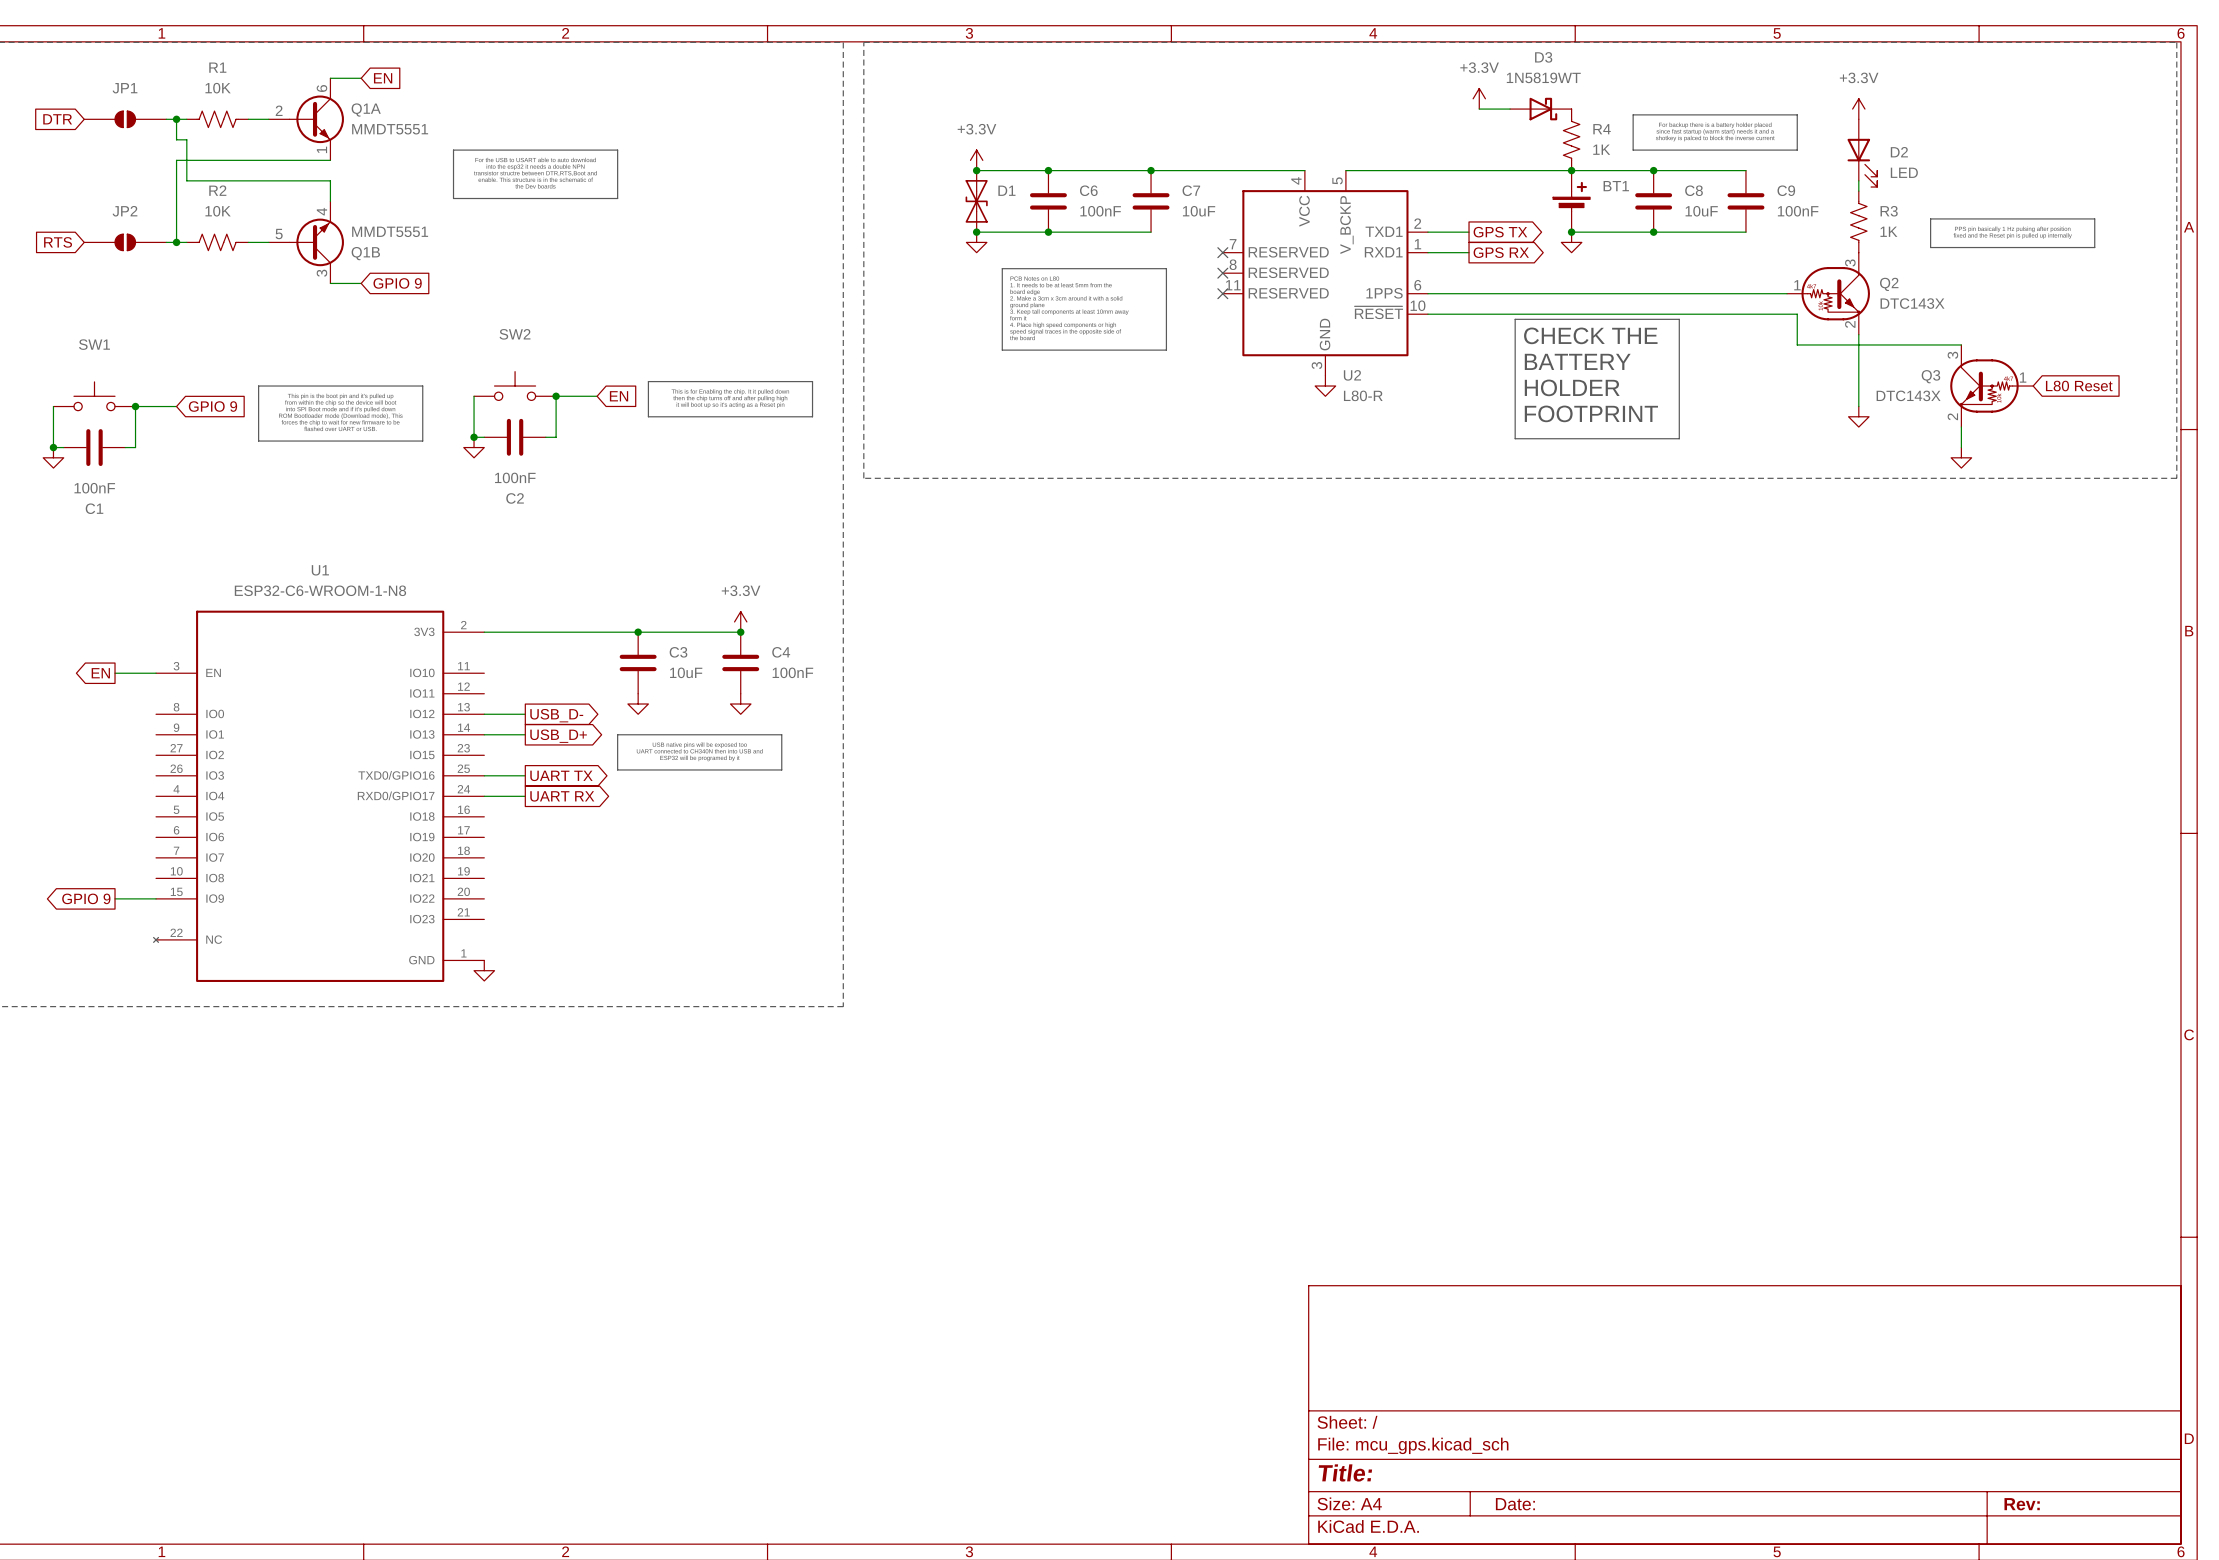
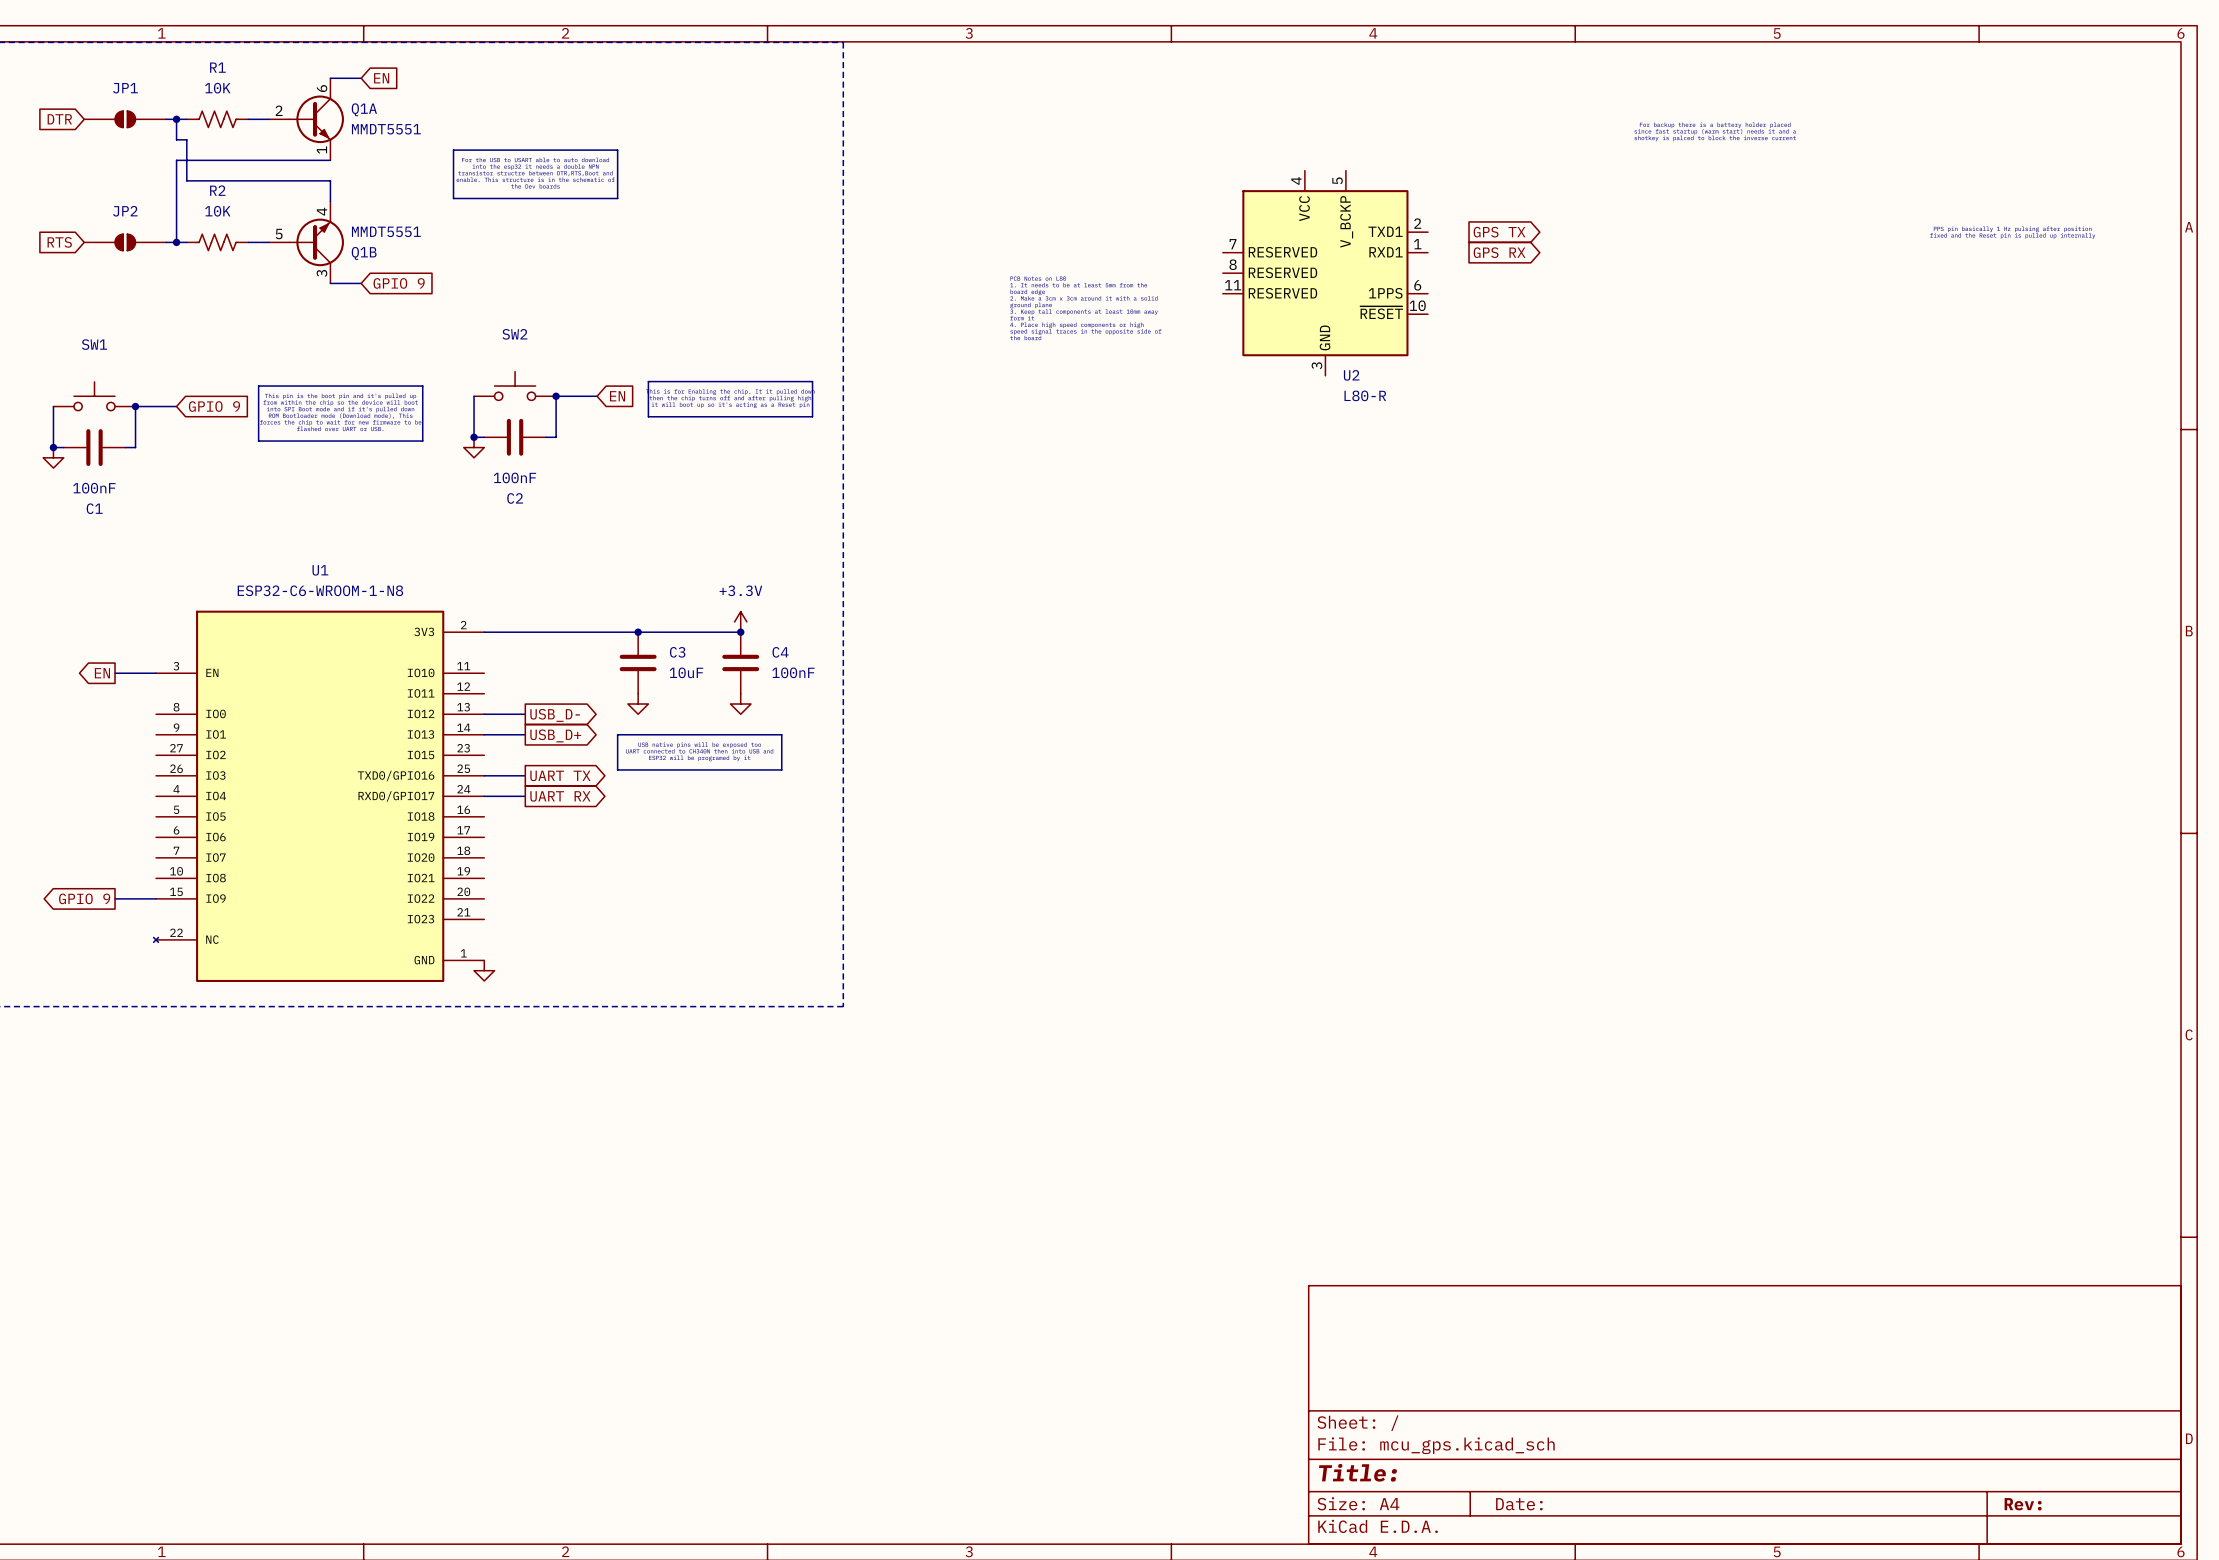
line: (863, 42) (2176, 42) (2176, 478) (863, 478) (863, 42) -> none
power symbol: +3.3V (1479, 98) -> none
wire: (1479, 109) (1510, 109) -> none
D3: 1N5819WT (1540, 109) -> none
power symbol: +3.3V (1858, 109) -> none
line: (1633, 114) (1797, 114) (1797, 150) (1633, 150) (1633, 114) -> none
R4: 1K (1571, 139) -> none
D2: LED (1862, 153) -> none
power symbol: +3.3V (976, 160) -> none
wire: (976, 170) (1304, 170) -> none
junction: (976, 170) -> none
junction: (1048, 170) -> none
junction: (1151, 170) -> none
wire: (1345, 170) (1745, 170) -> none
junction: (1571, 170) -> none
junction: (1653, 170) -> none
wire: (1858, 180) (1858, 191) -> none
D1: (976, 201) -> none
C6: 100nF (1048, 201) -> none
C7: 10uF (1151, 201) -> none
BT1: (1571, 201) -> none
C8: 10uF (1653, 201) -> none
C9: 100nF (1745, 201) -> none
line: (1930, 218) (2094, 218) (2094, 247) (1930, 247) (1930, 218) -> none
R3: 1K (1858, 221) -> none
wire: (976, 232) (1151, 232) -> none
junction: (976, 232) -> none
junction: (1048, 232) -> none
wire: (1427, 232) (1469, 232) -> none
wire: (1571, 232) (1745, 232) -> none
junction: (1571, 232) -> none
junction: (1653, 232) -> none
power symbol: (976, 242) -> none
power symbol: (1571, 242) -> none
no-connect mark: (1222, 252) -> none
wire: (1427, 252) (1469, 252) -> none
line: (1002, 268) (1166, 268) (1166, 350) (1002, 350) (1002, 268) -> none
no-connect mark: (1222, 273) -> none
no-connect mark: (1222, 293) -> none
wire: (1427, 293) (1787, 293) -> none
Q2: DTC143X (1828, 293) -> none
wire: (1427, 314) (1797, 314) (1797, 344) (1961, 344) -> none
line: (1515, 319) (1679, 319) (1679, 438) (1515, 438) (1515, 319) -> none
wire: (1858, 334) (1858, 406) -> none
text: CHECK THE (1590, 335) -> none
text: BATTERY (1577, 361) -> none
power symbol: (1325, 386) -> none
Q3: DTC143X (1991, 386) -> none
global label: L80 Reset (2079, 386) -> none
text: HOLDER (1572, 387) -> none
text: FOOTPRINT (1591, 413) -> none
power symbol: (1858, 416) -> none
wire: (1961, 427) (1961, 447) -> none
power symbol: (1961, 457) -> none

